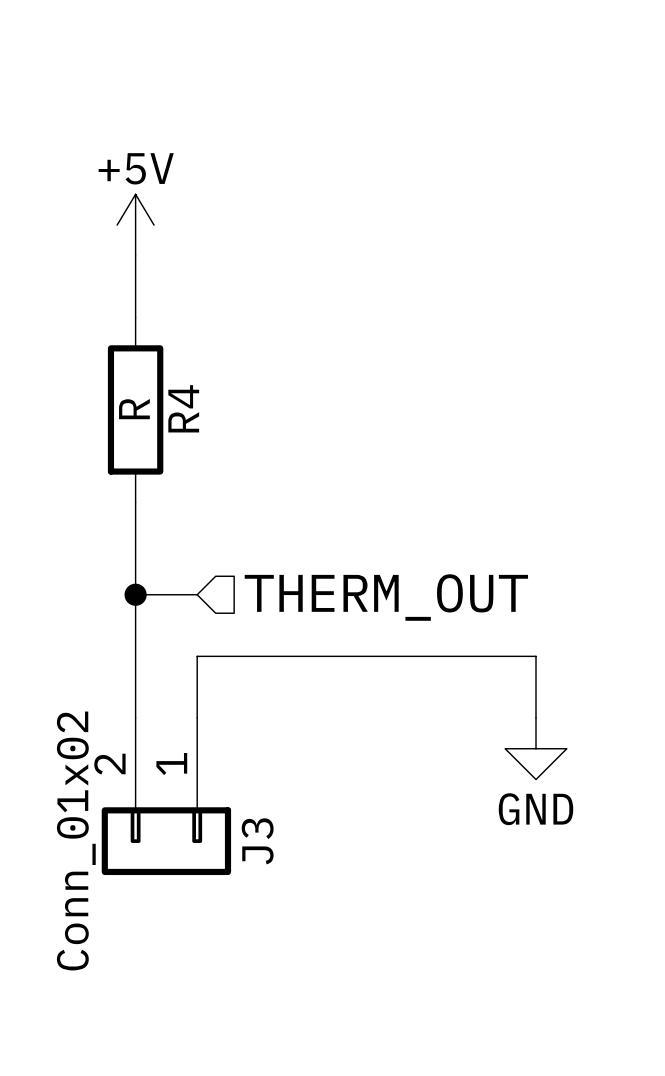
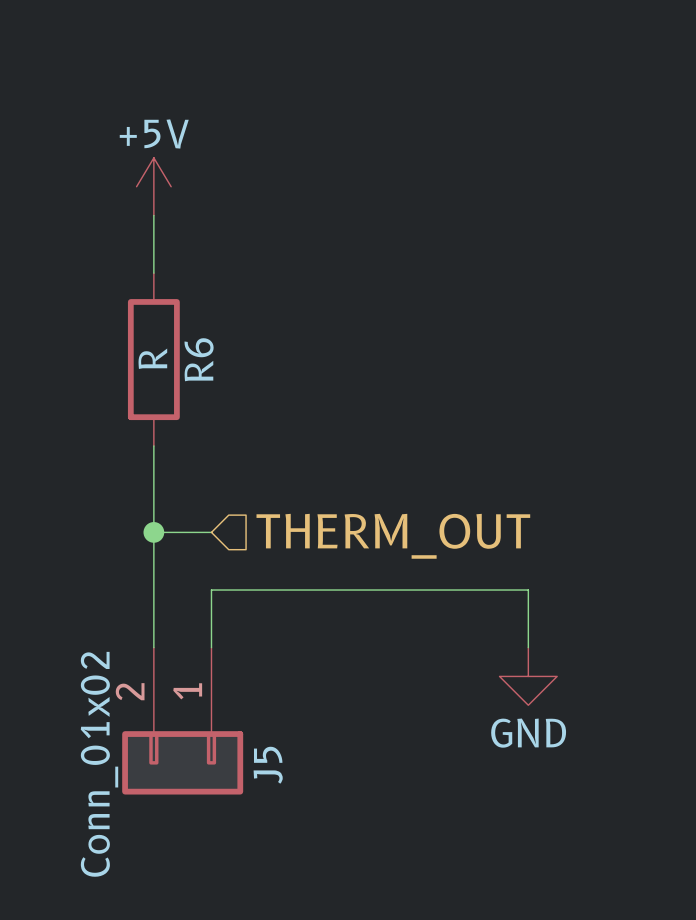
R4 name: R4 (183, 408) -> R6 (199, 359)
J3 name: J3 (257, 841) -> J5 (268, 765)

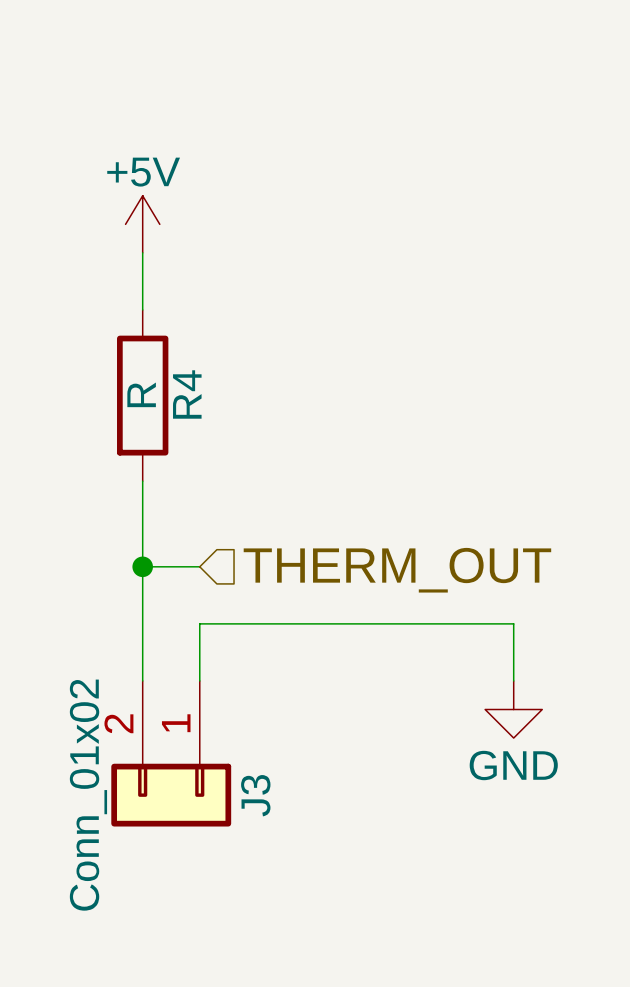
R6 name: R6 (199, 359) -> R4 (187, 394)
J5 name: J5 (268, 765) -> J3 (255, 795)

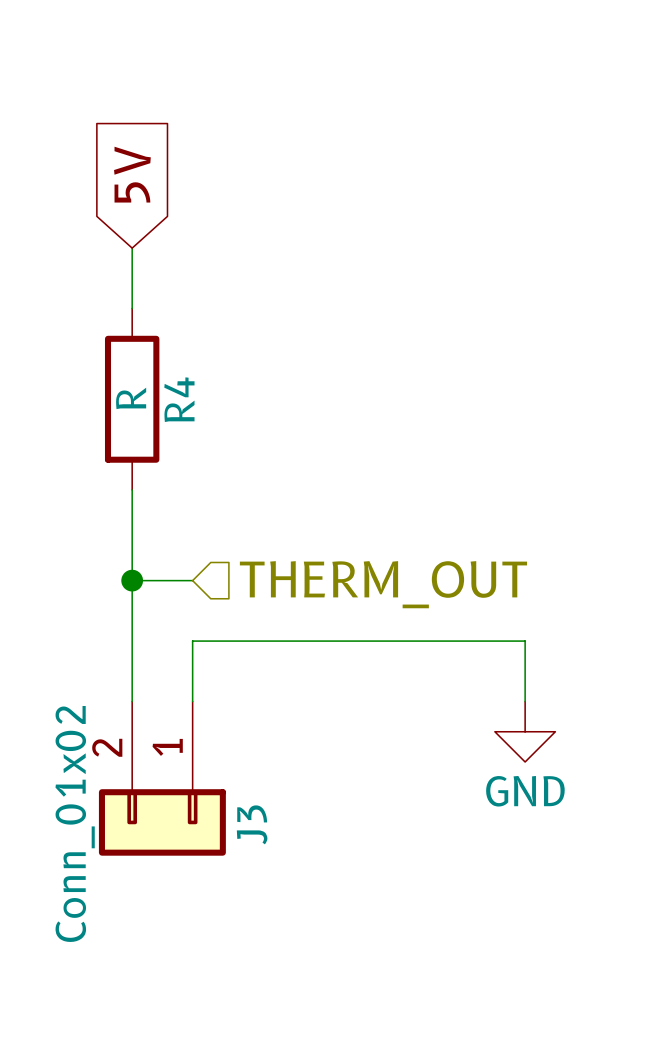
global label: none -> 5V (132, 174)
power symbol: +5V (142, 224) -> none

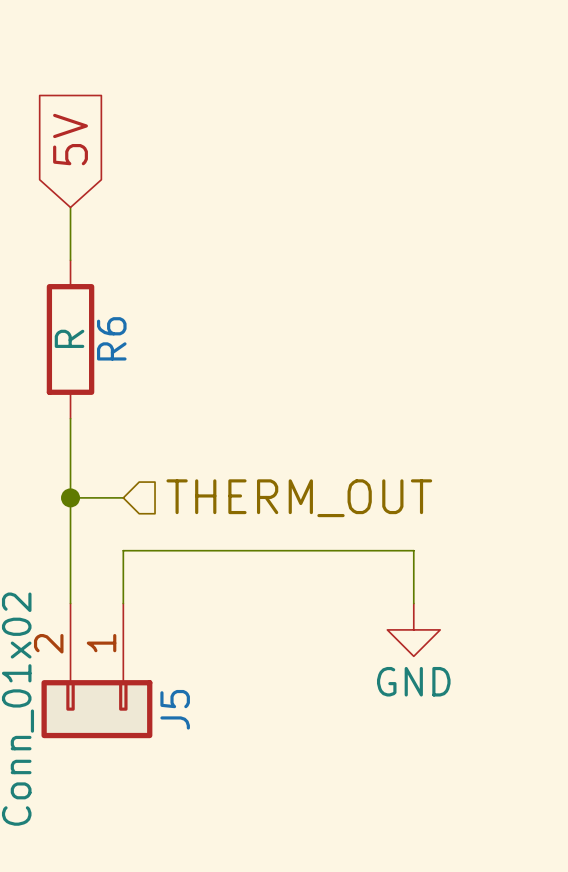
R4 name: R4 (179, 399) -> R6 (111, 338)
J3 name: J3 (252, 824) -> J5 (175, 709)

